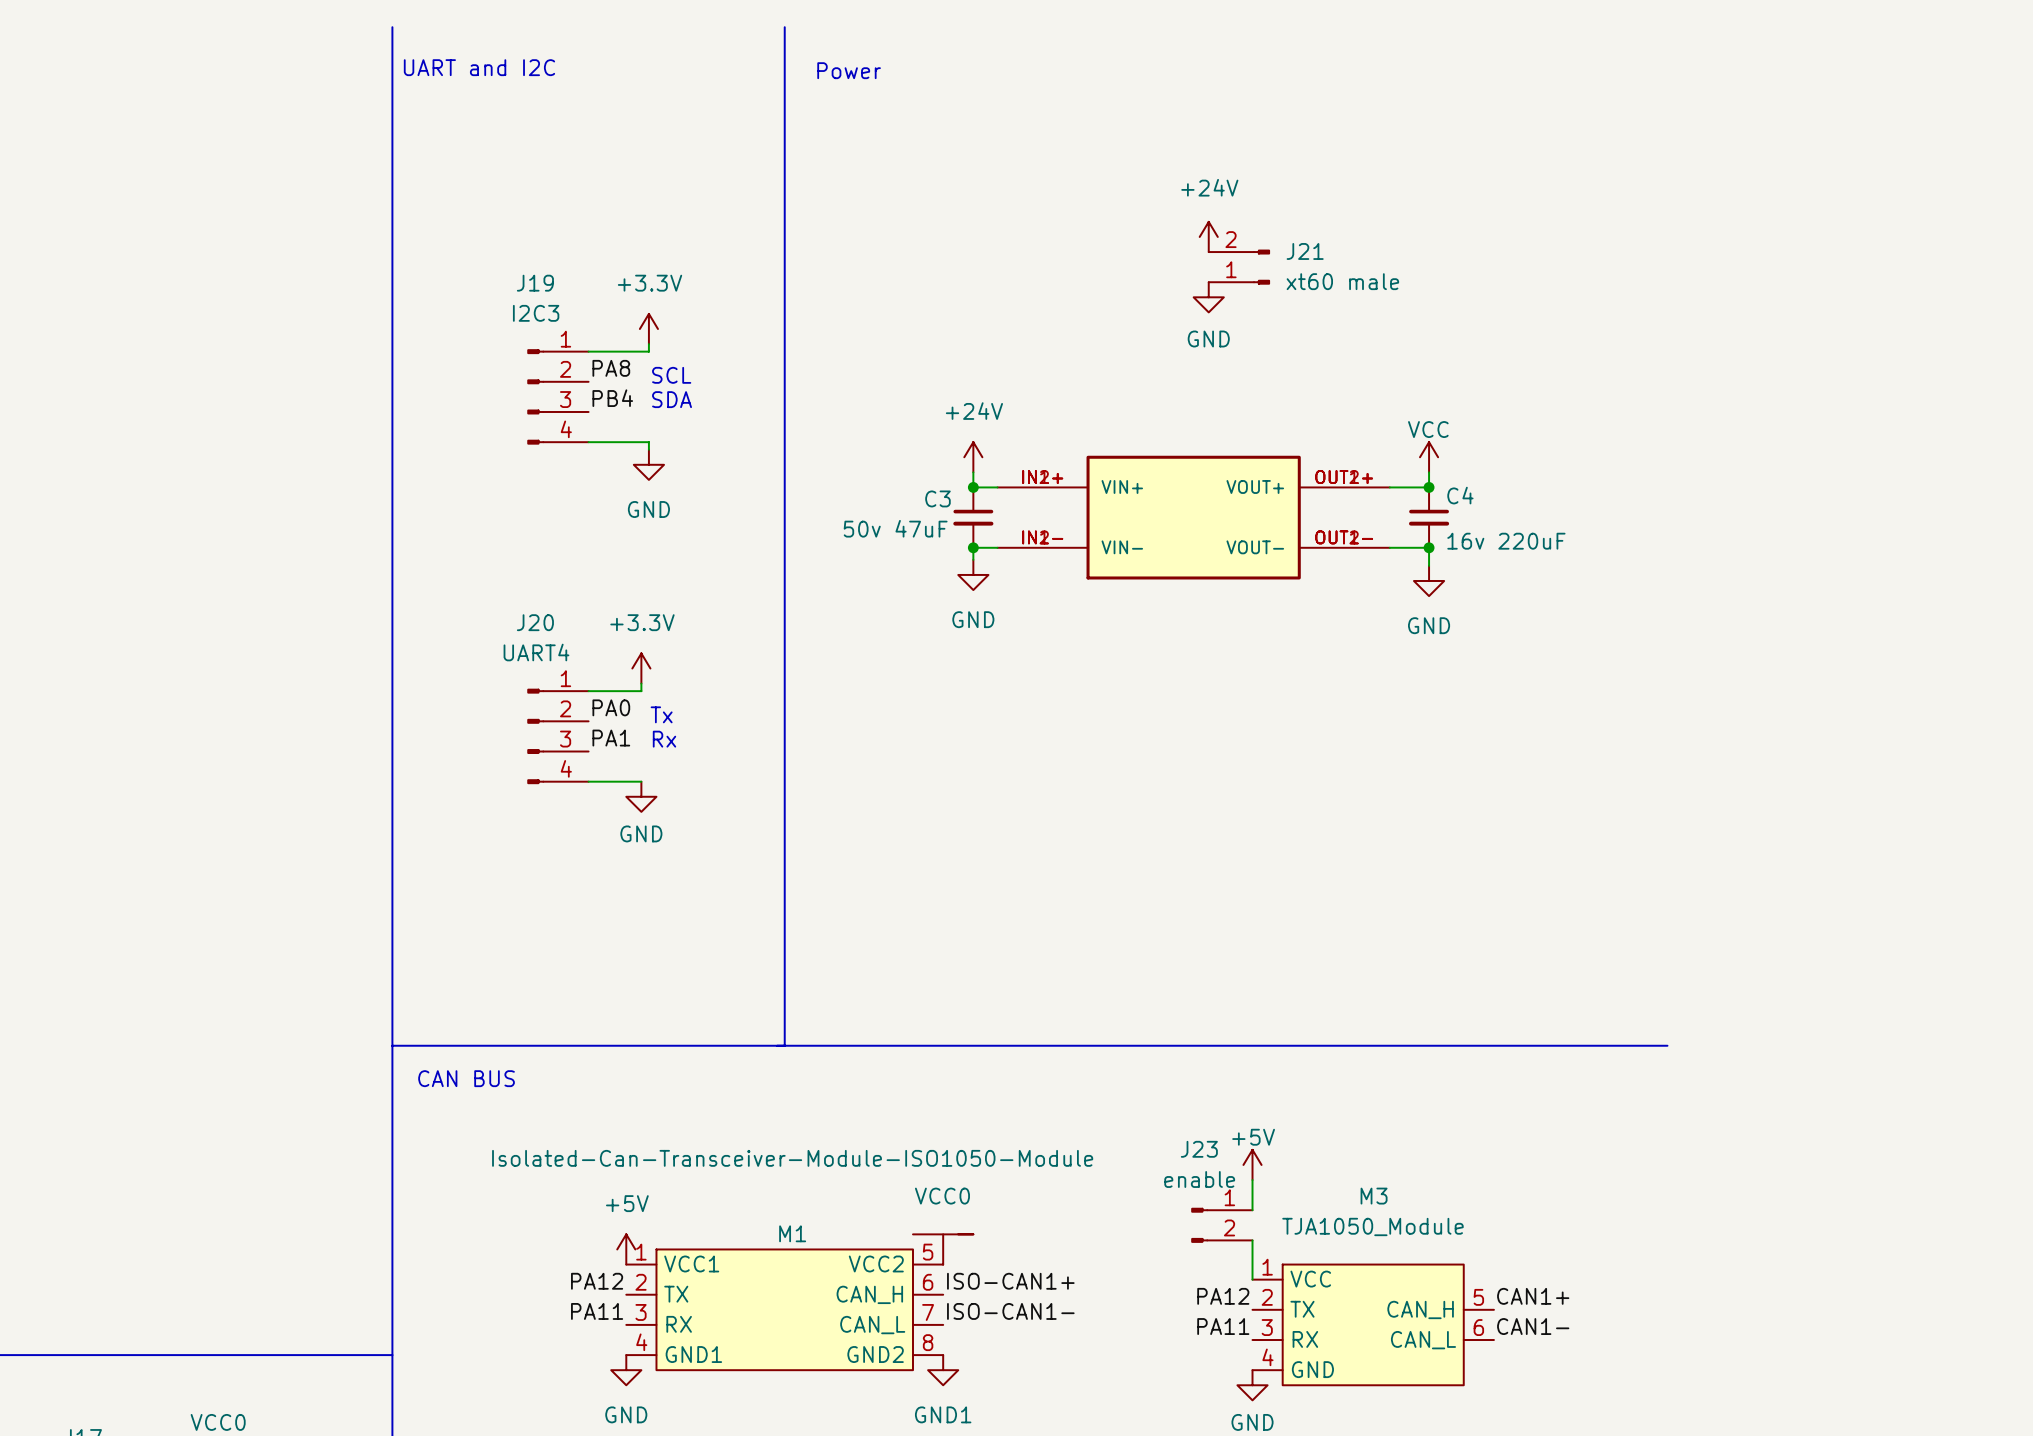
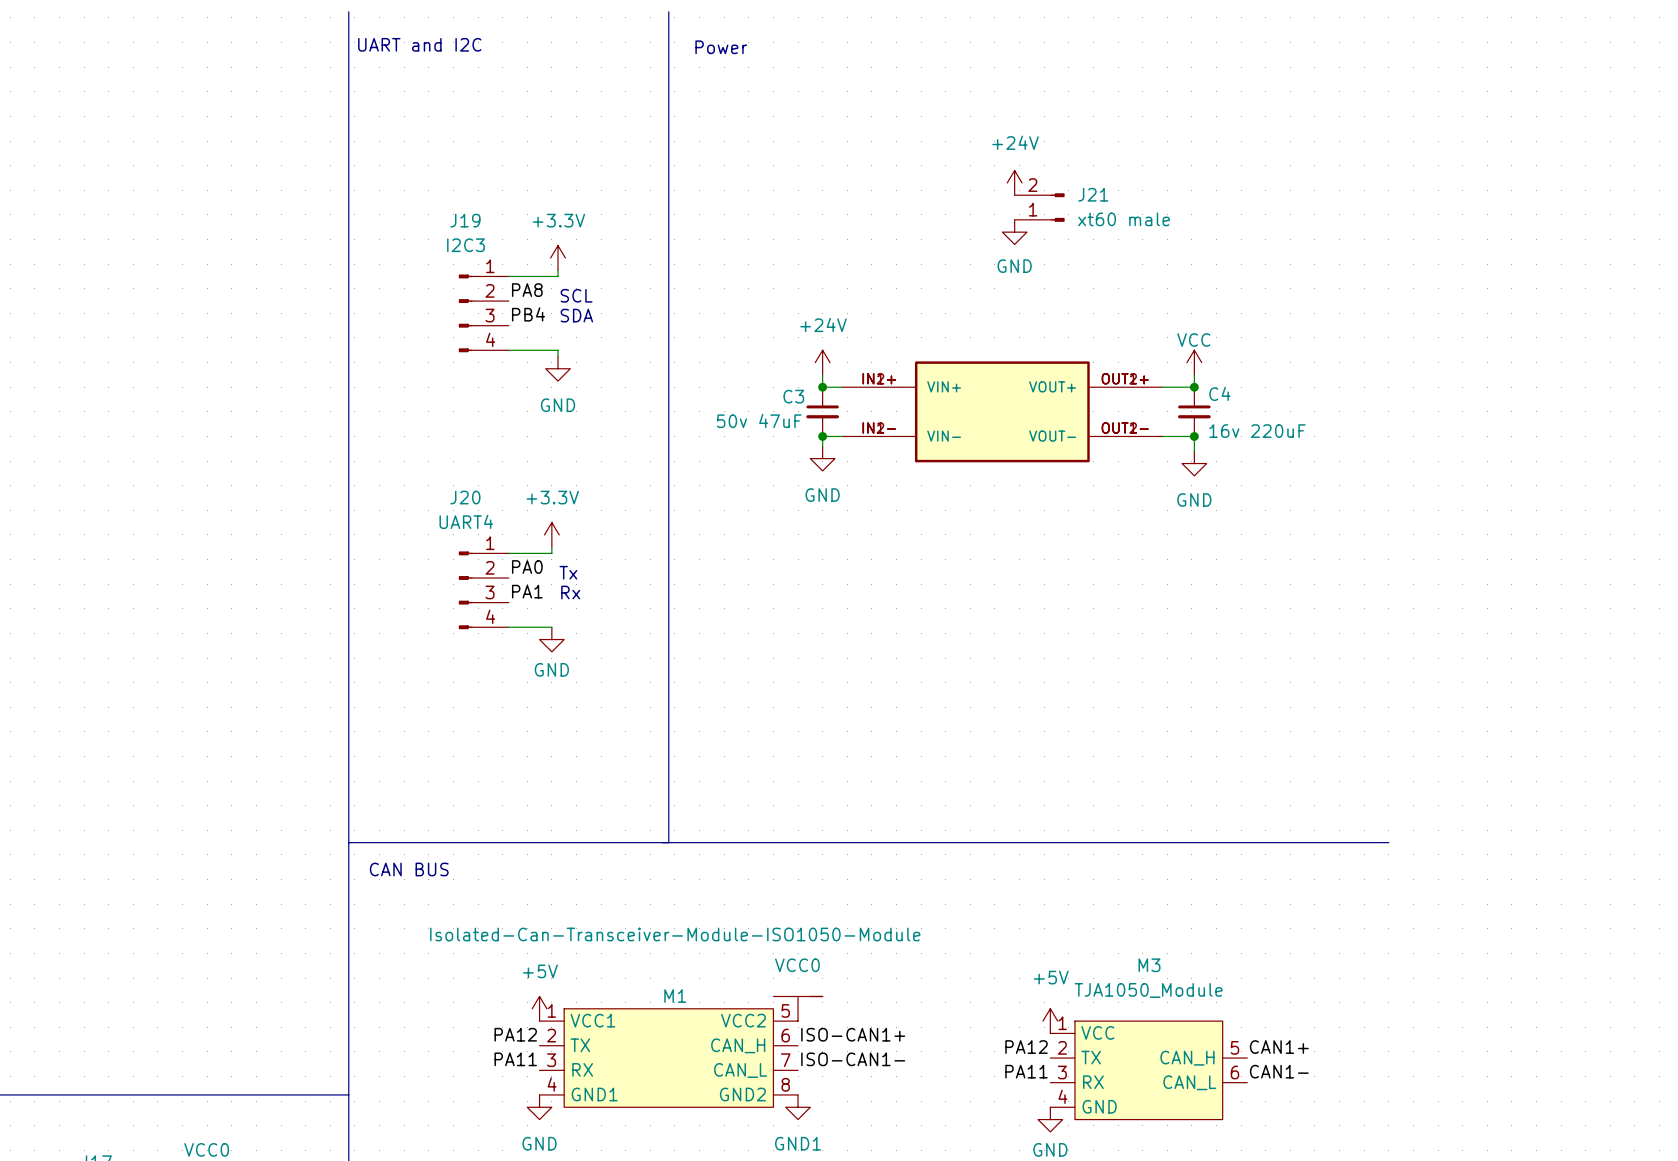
power symbol text position: +5V (1253, 1137) -> +5V (1051, 977)
power symbol position: +5V (1252, 1164) -> +5V (1050, 1021)
wire: (1252, 1180) (1252, 1210) -> none
J23: enable (1221, 1225) -> none

